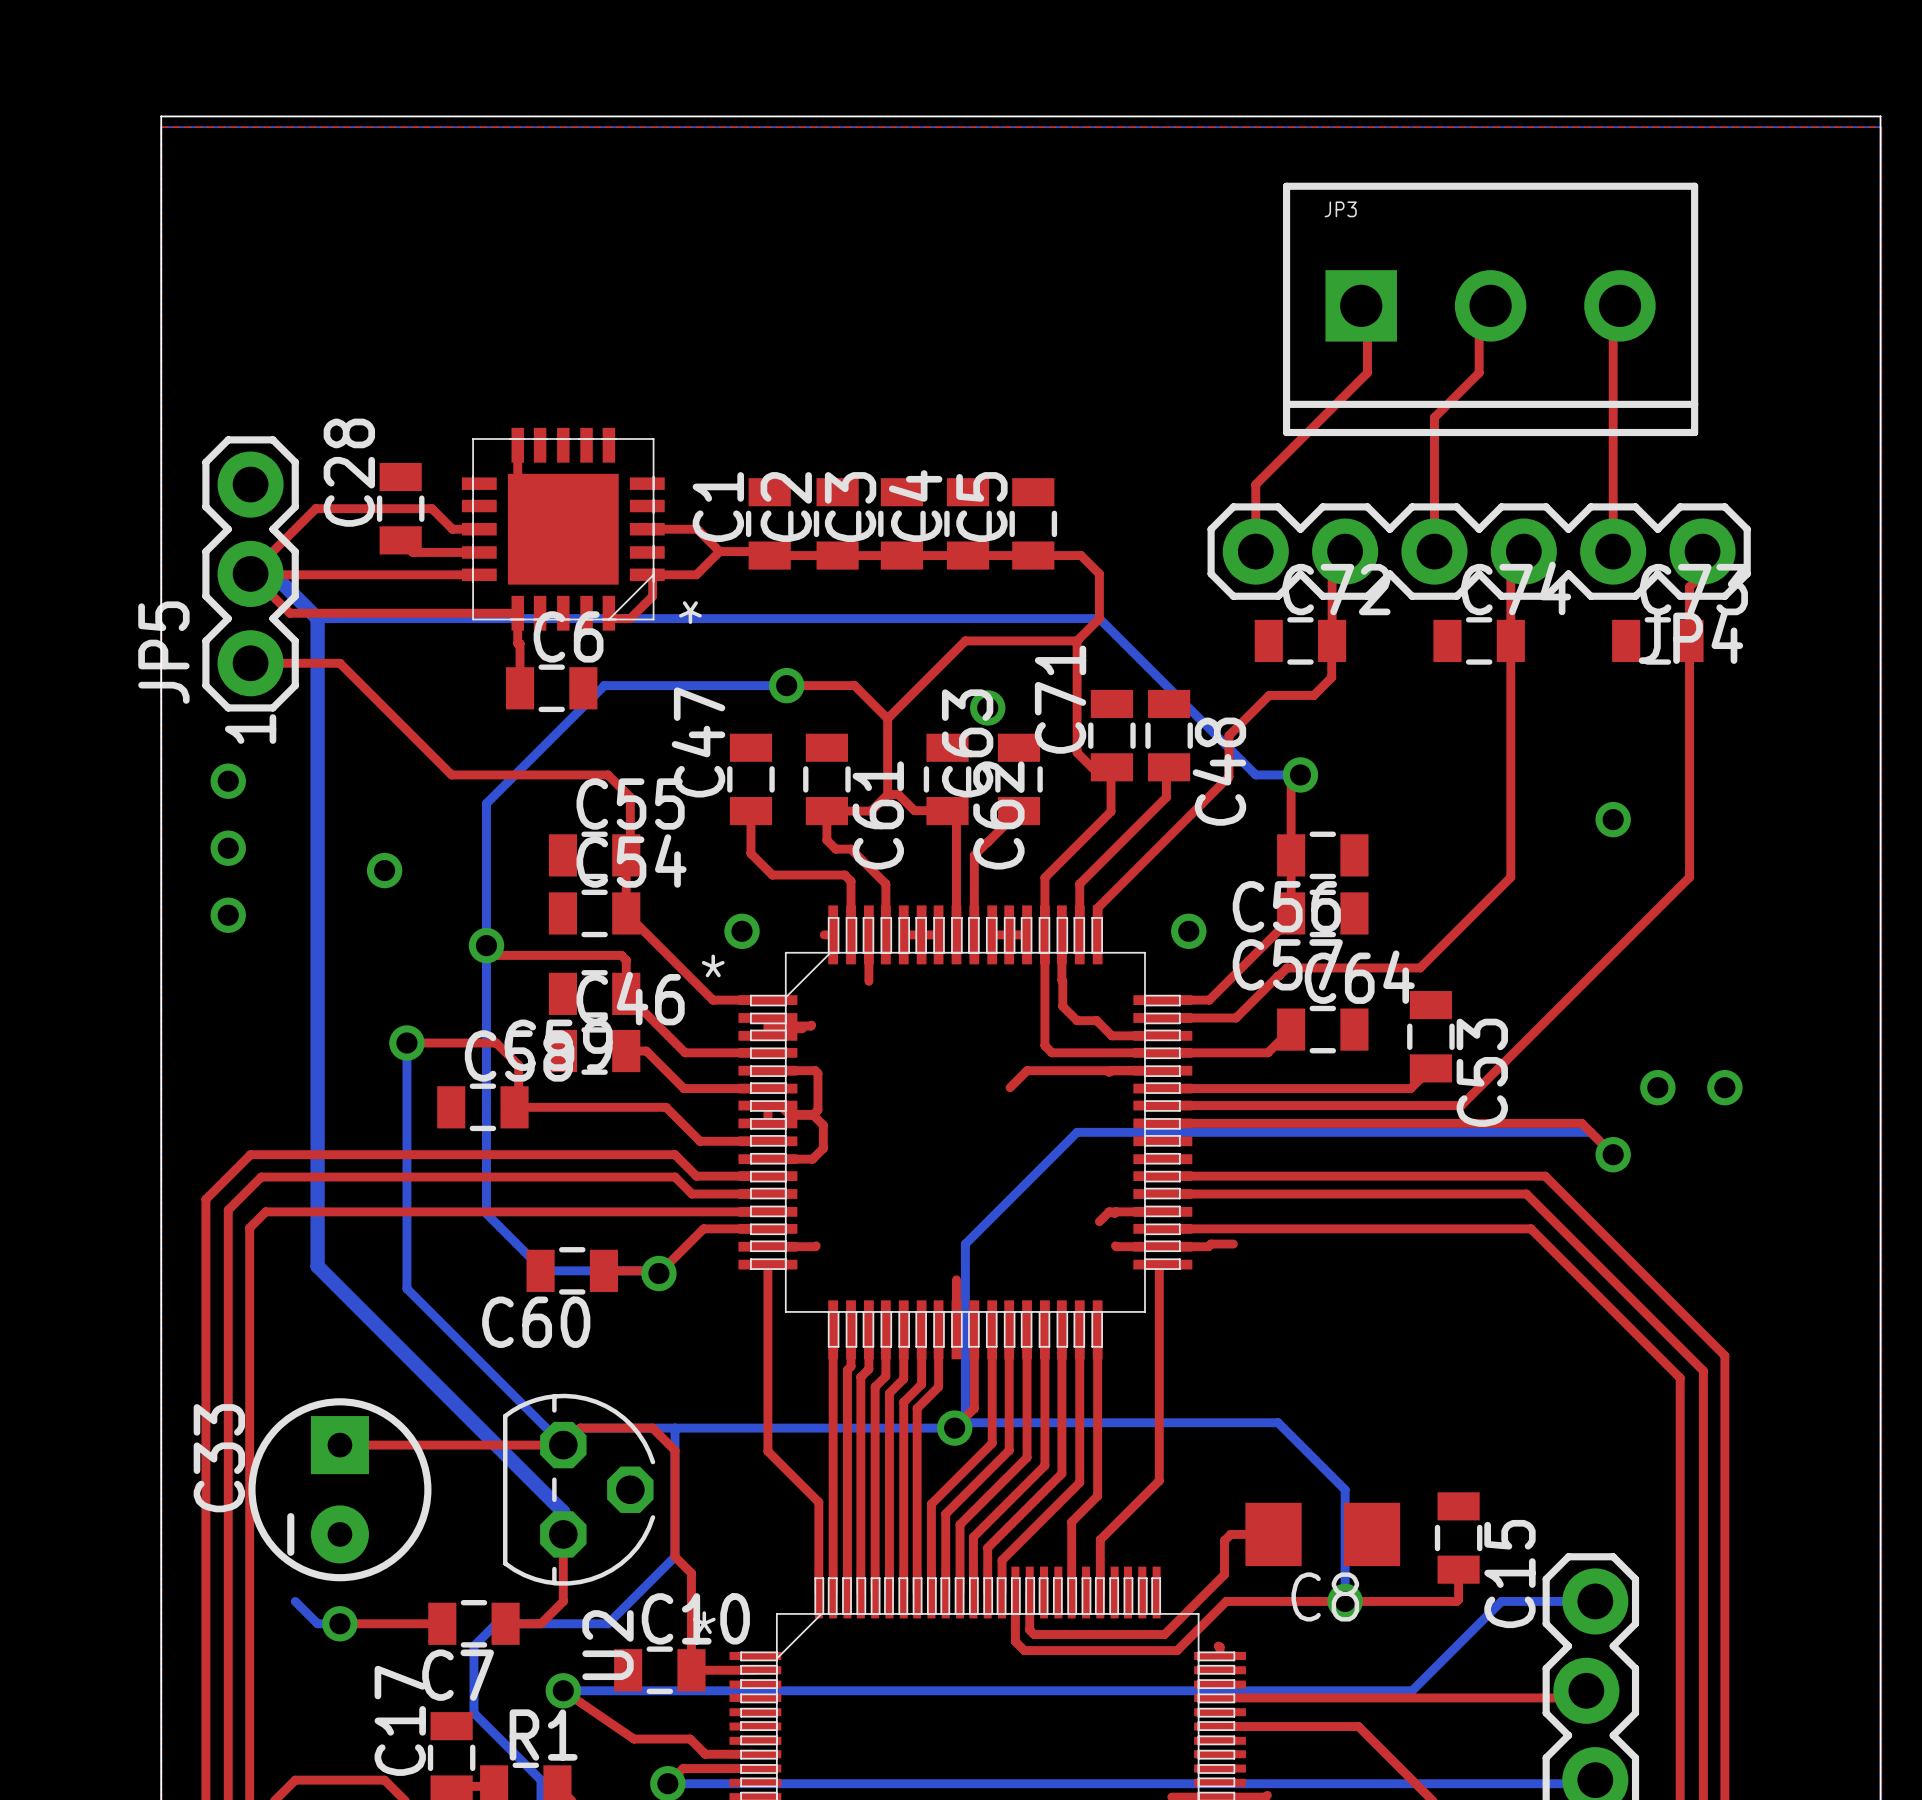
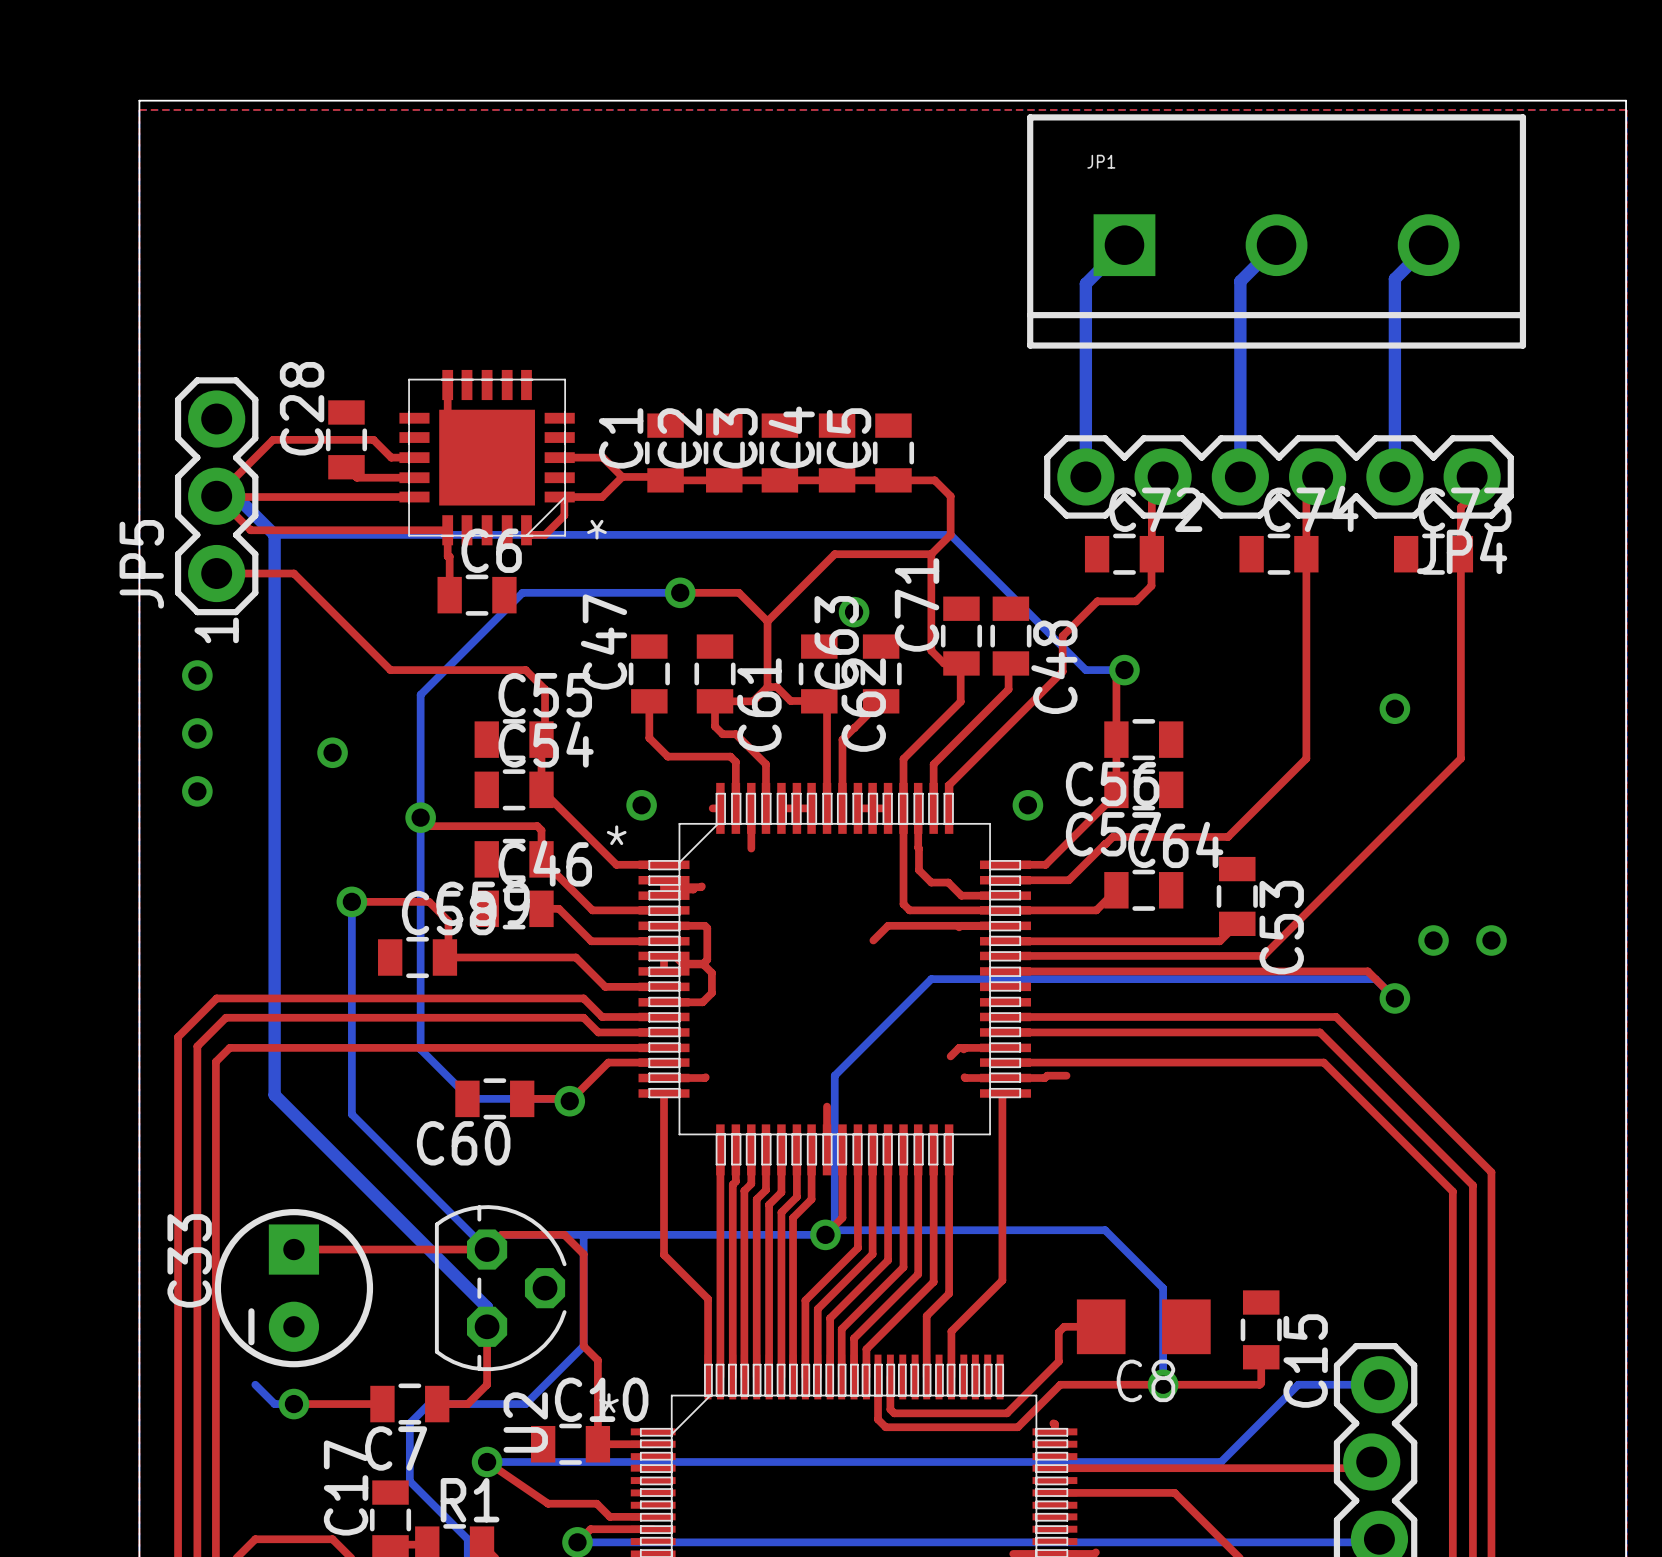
JP1: none -> (1276, 231)
bottom track: none -> (1124, 245) (1085, 283) (1085, 476)
bottom track: none -> (1276, 245) (1240, 281) (1240, 476)
bottom track: none -> (1428, 245) (1394, 278) (1394, 476)
top track: (1361, 305) (1367, 312) (1367, 372) (1255, 484) (1255, 551) -> none
top track: (1490, 305) (1479, 317) (1479, 372) (1434, 417) (1434, 551) -> none
top track: (1619, 305) (1613, 312) (1613, 551) -> none
JP3: (1490, 309) -> none

